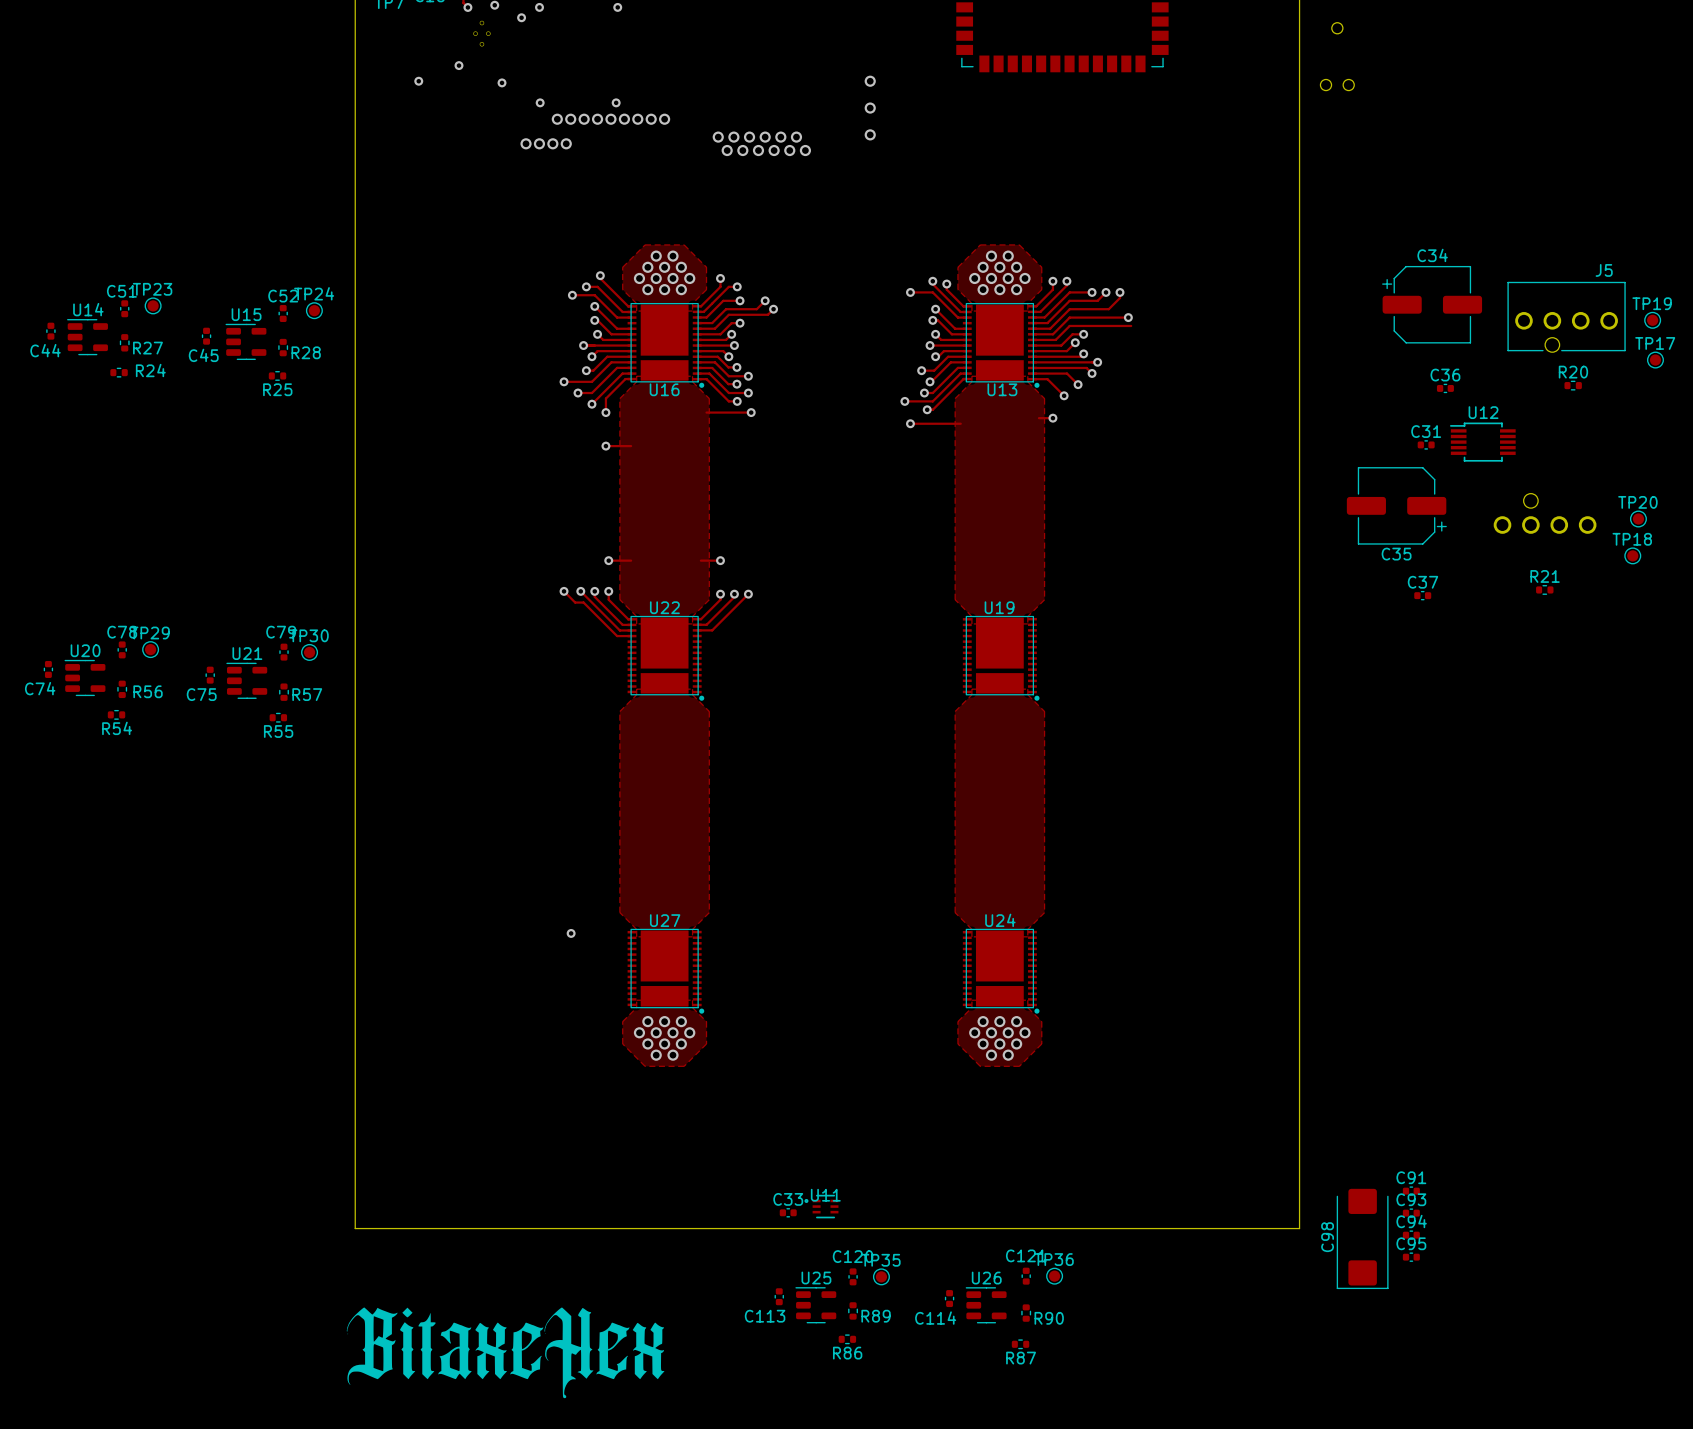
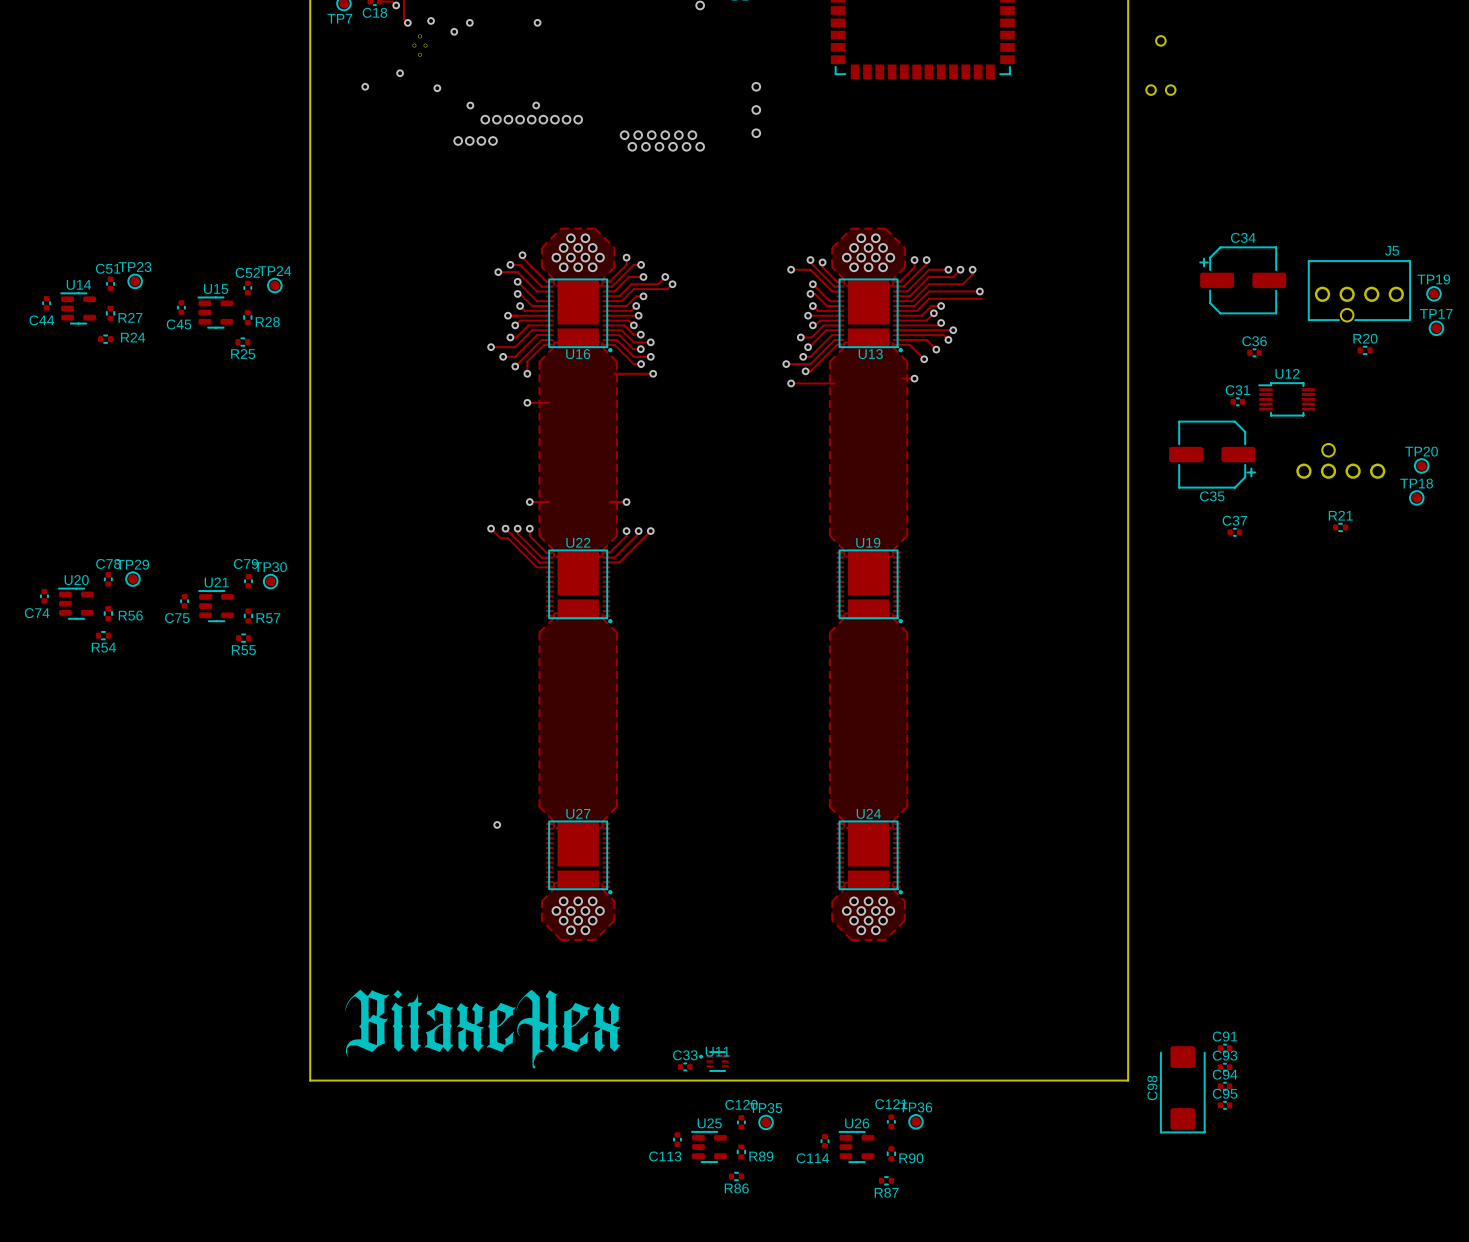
drawing position: (505, 1352) -> (482, 1029)

